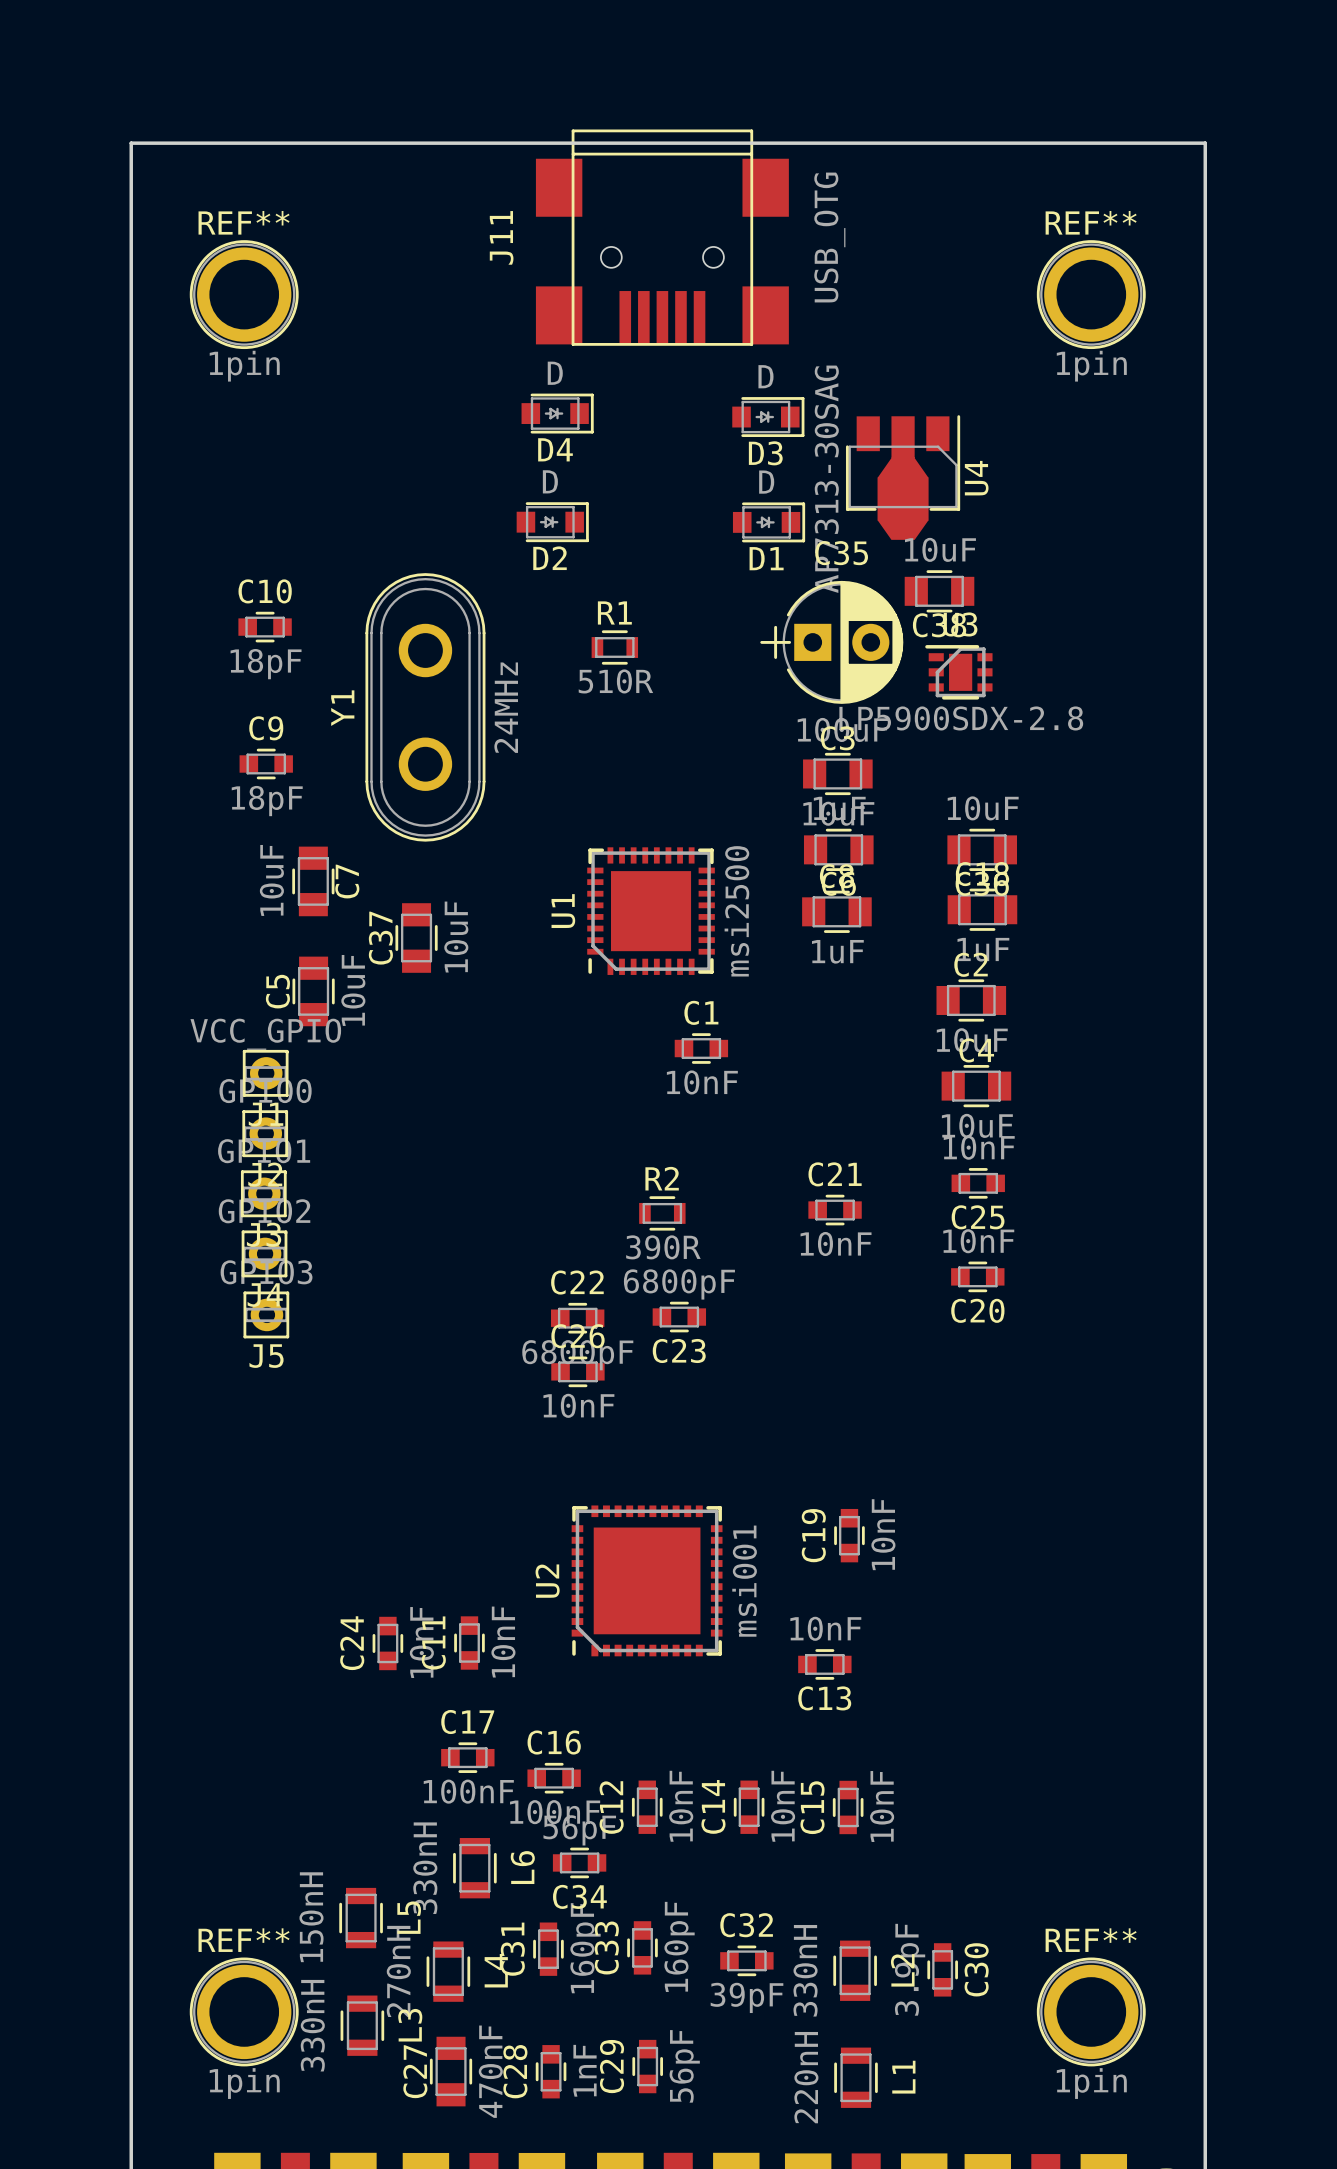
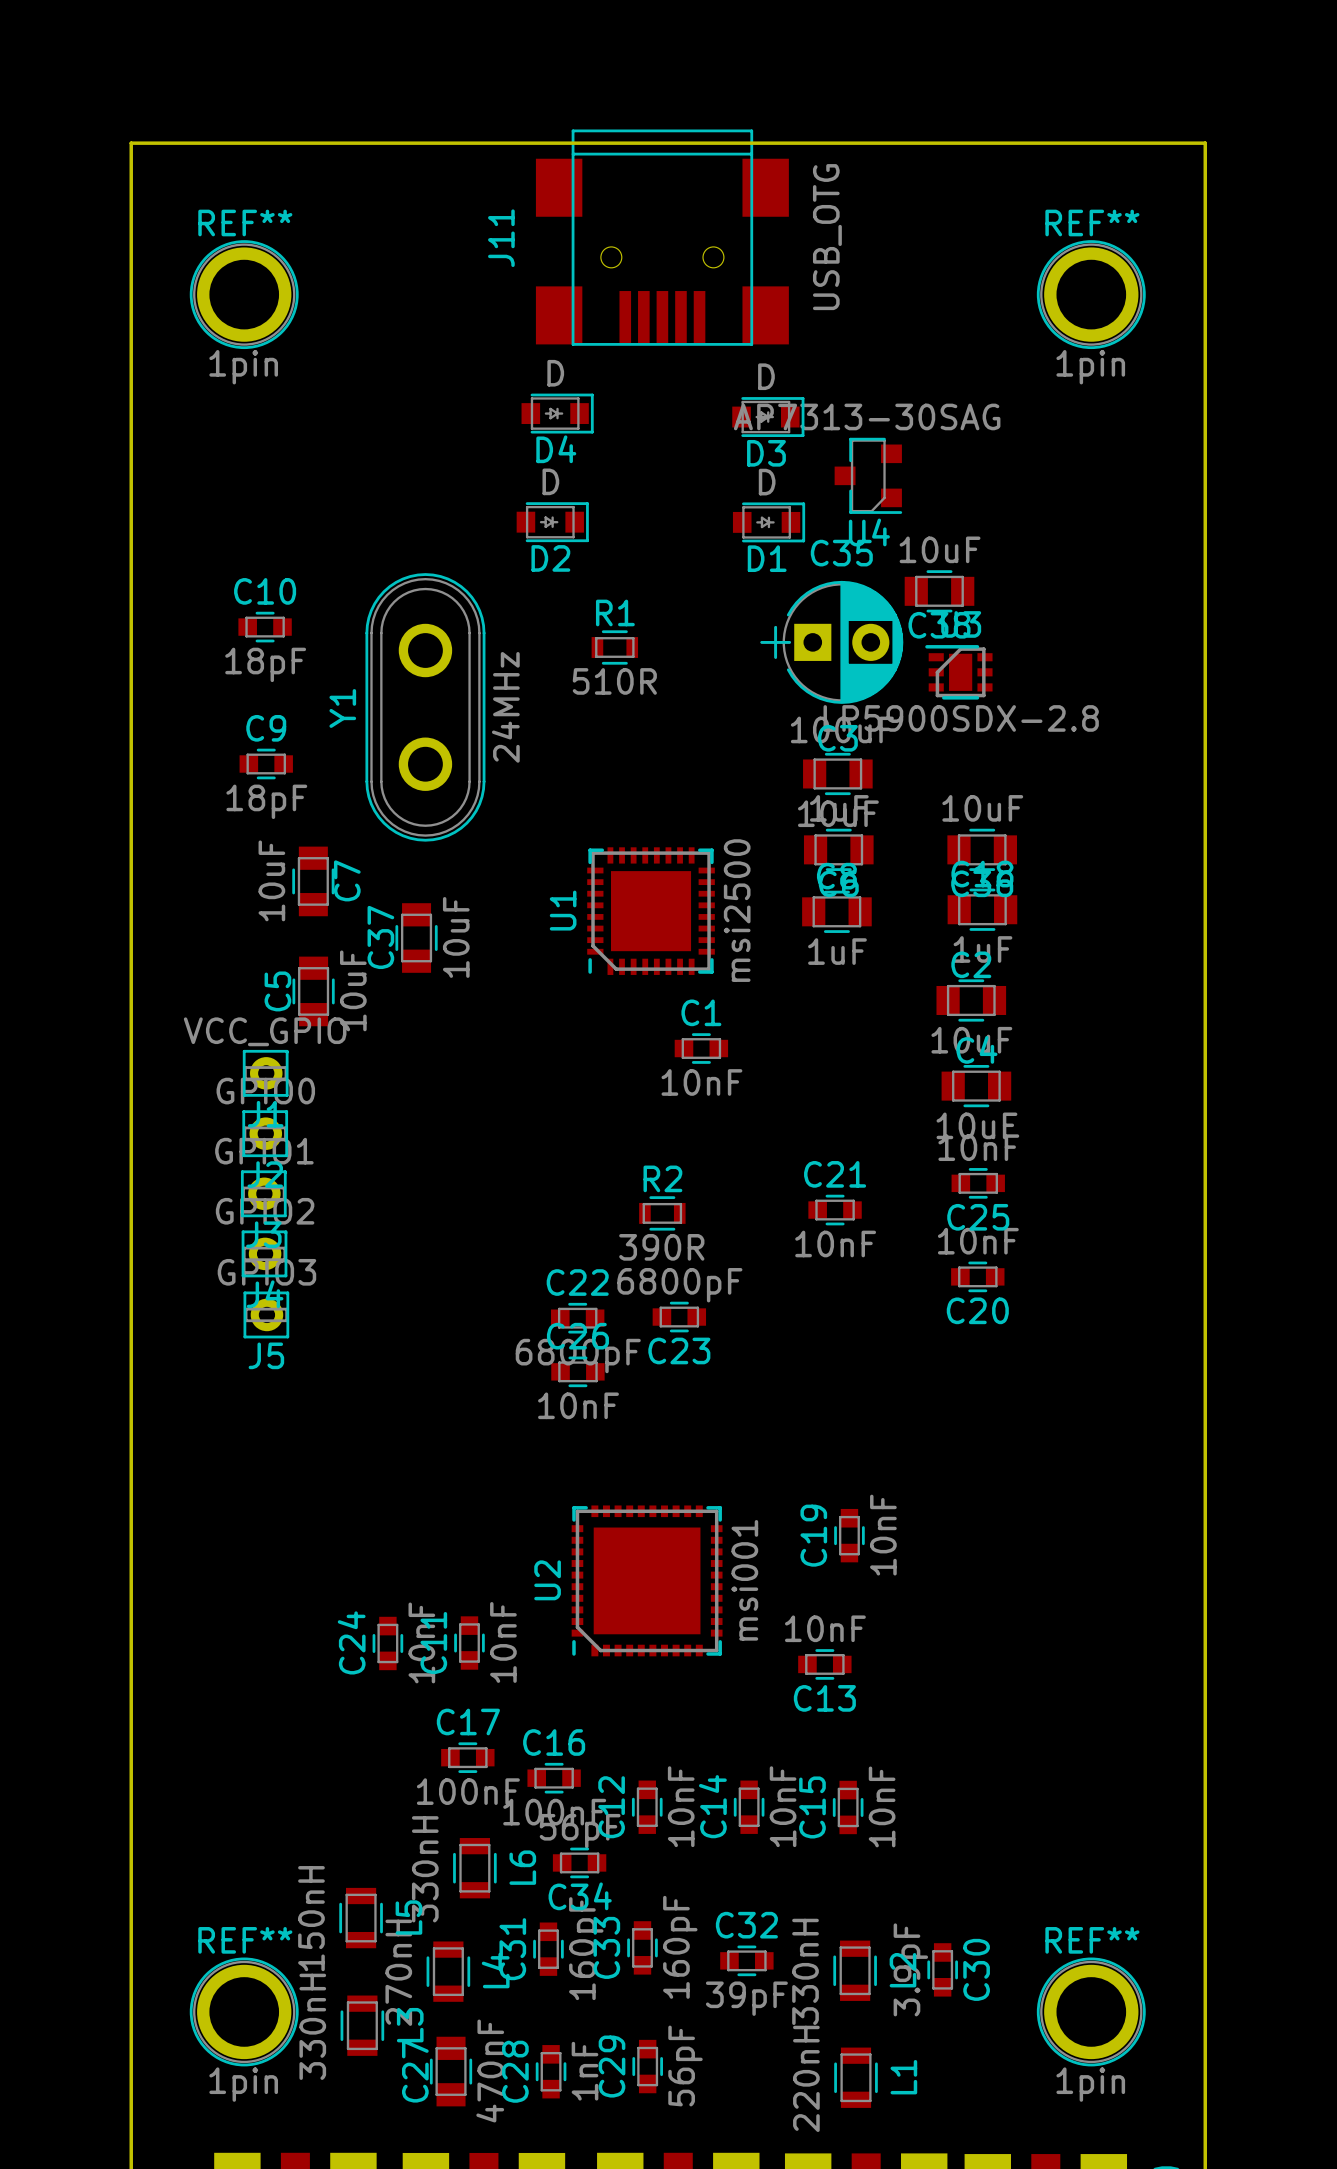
U4 footprint: [845, 415, 961, 540] -> [834, 437, 903, 514]
U4 name position: U4 (976, 478) -> U4 (869, 532)
U4 value position: AP7313-30SAG (826, 479) -> AP7313-30SAG (867, 416)

